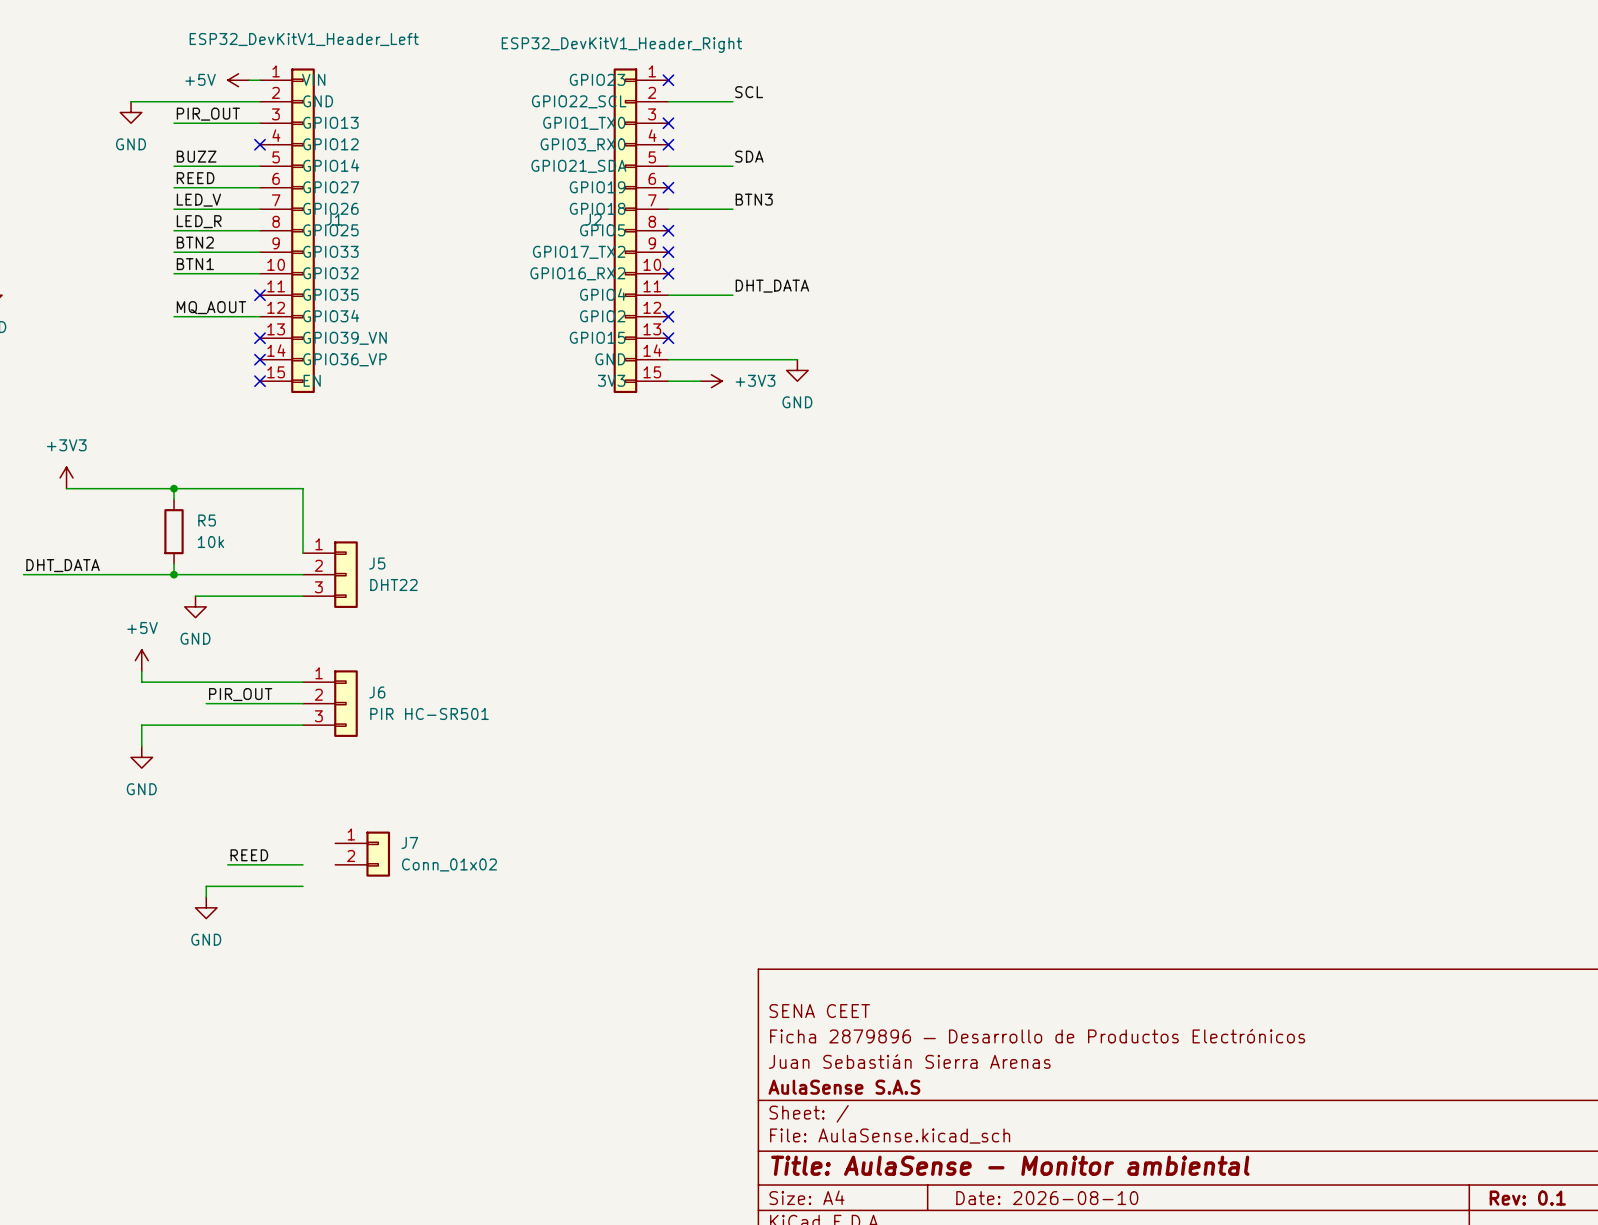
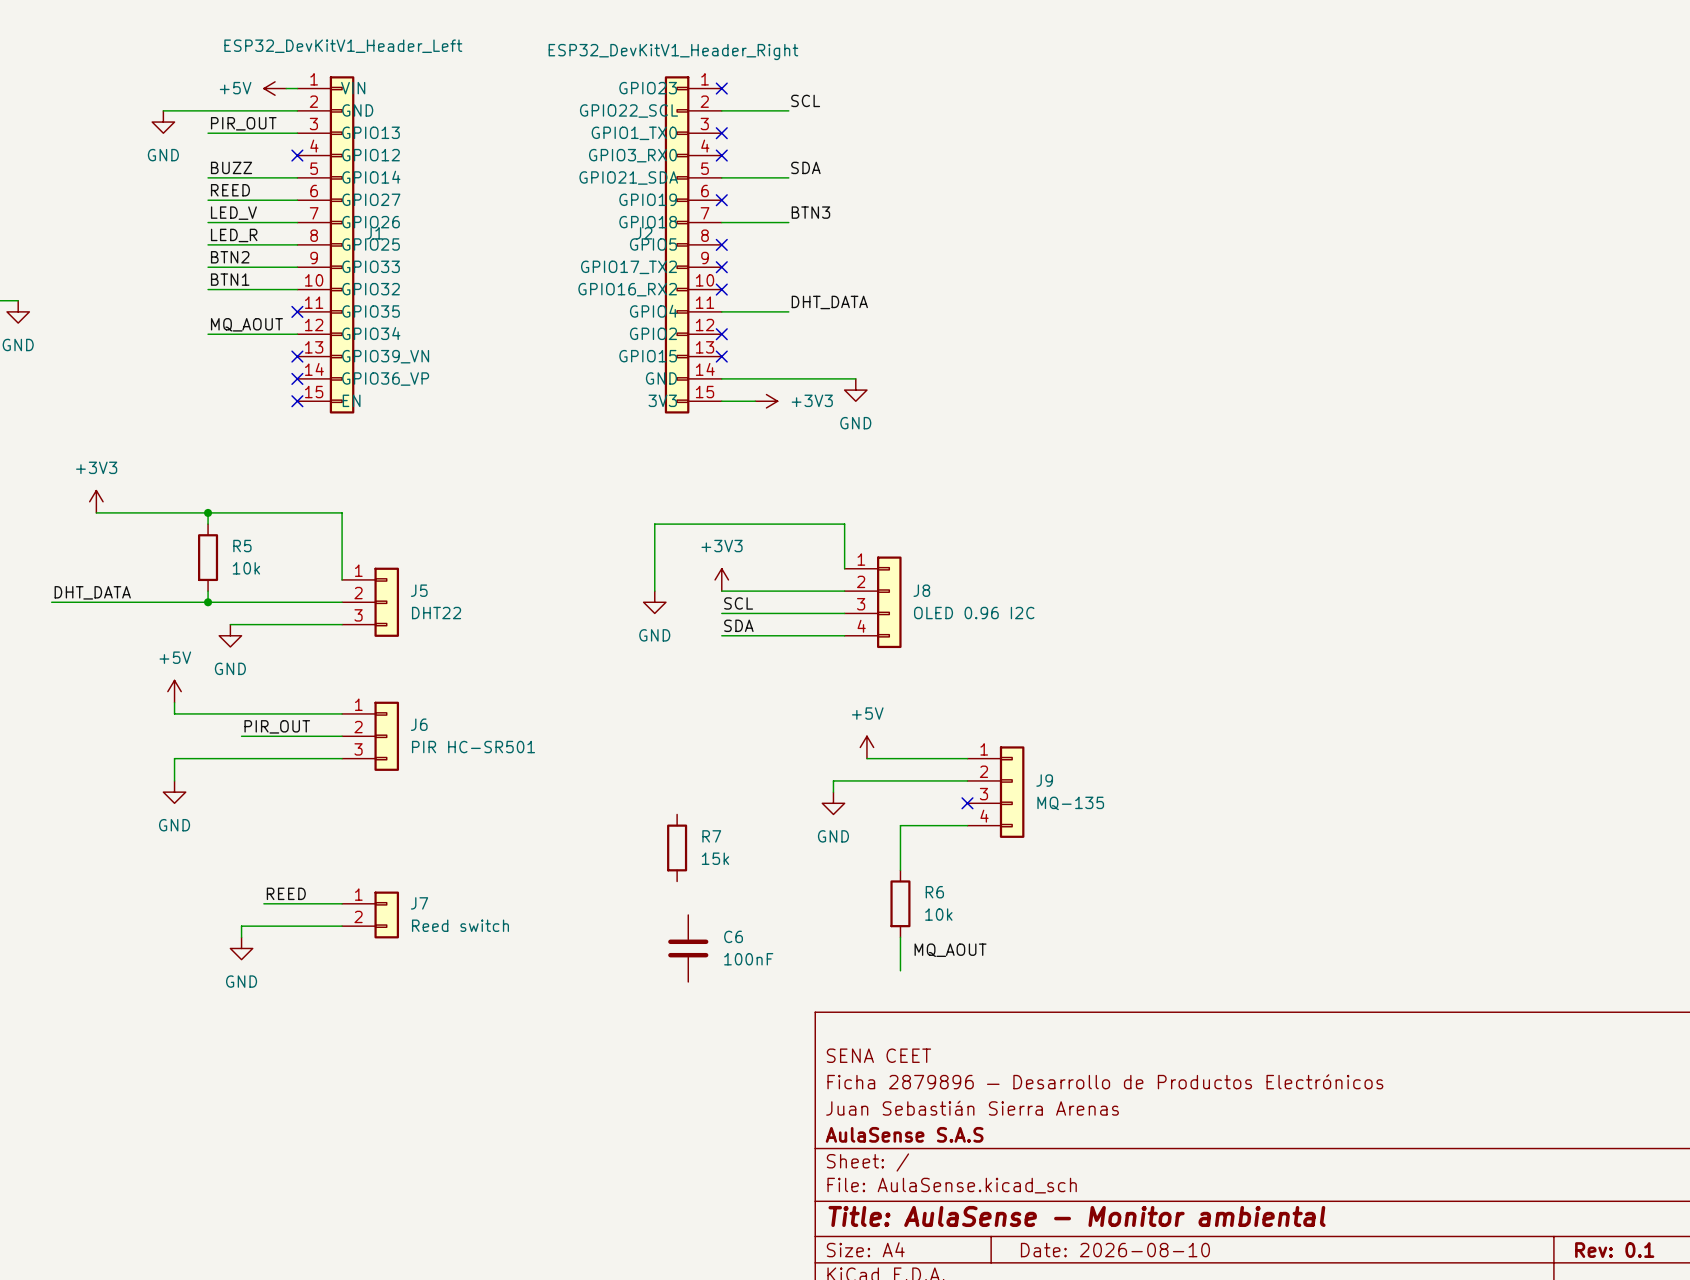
wire: none -> (844, 568) (844, 524) (654, 524) (654, 591)
power symbol: none -> +3V3 (721, 579)
wire: none -> (721, 591) (844, 591)
power symbol: none -> GND (654, 602)
J8: none -> OLED 0.96 I2C (873, 602)
label: none -> SCL (738, 603)
wire: none -> (721, 613) (844, 613)
label: none -> SDA (738, 625)
wire: none -> (721, 635) (844, 635)
power symbol: none -> +5V (866, 747)
wire: none -> (866, 758) (967, 758)
wire: none -> (967, 780) (833, 780) (833, 792)
J9: none -> MQ-135 (995, 792)
power symbol: none -> GND (833, 803)
no-connect mark: none -> (967, 803)
wire: none -> (967, 825) (900, 825) (900, 870)
R7: none -> 15k (677, 847)
J7 position: (362, 854) -> (370, 914)
J7 value: Conn_01x02 (449, 864) -> Reed switch (460, 925)
R6: none -> 10k (900, 903)
wire: none -> (900, 937) (900, 970)
C6: none -> 100nF (688, 948)
label: none -> MQ_AOUT (950, 950)

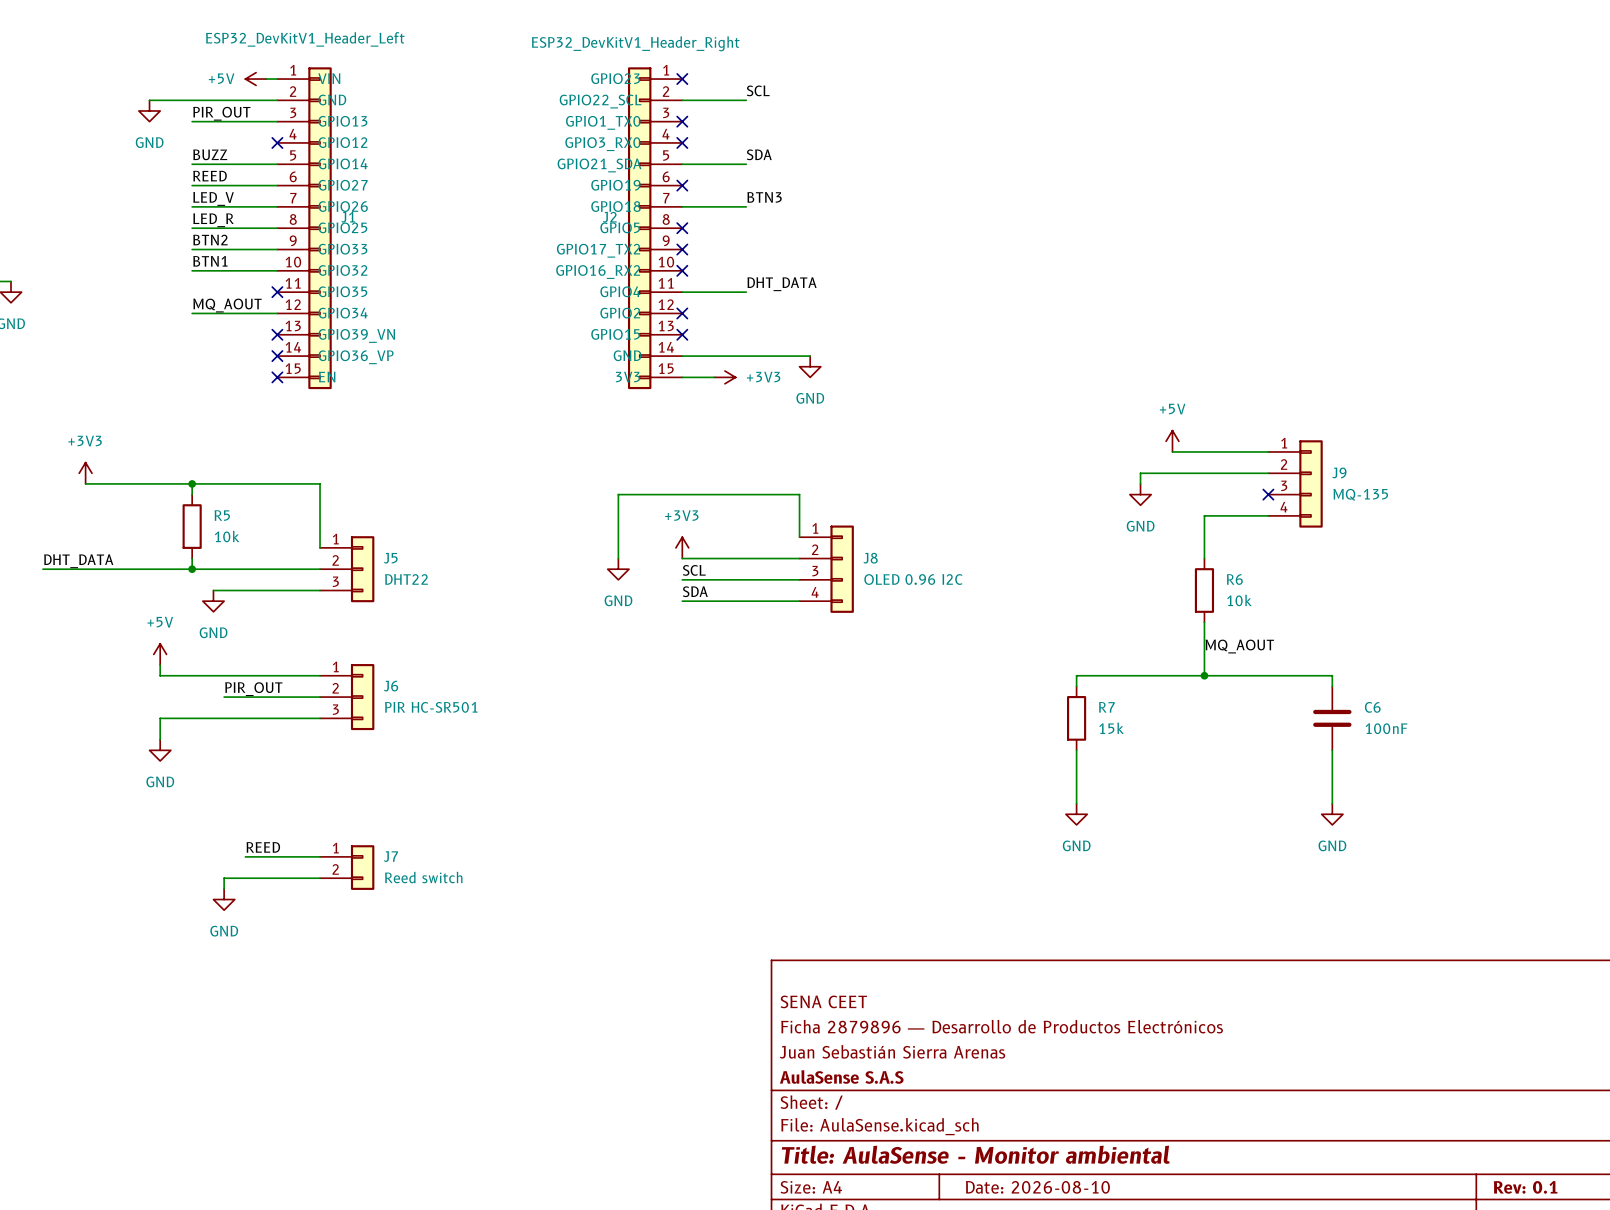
power symbol: none -> +5V (1172, 441)
wire: none -> (1172, 451) (1268, 451)
wire: none -> (1268, 473) (1140, 473) (1140, 483)
power symbol: none -> GND (1140, 494)
no-connect mark: none -> (1268, 494)
wire: none -> (1268, 515) (1204, 515) (1204, 558)
wire: none -> (1204, 622) (1204, 675)
label: none -> MQ_AOUT (1239, 646)
junction: none -> (1204, 675)
wire: none -> (1076, 686) (1076, 675) (1332, 675) (1332, 686)
power symbol: +5V (866, 747) -> none
wire: (866, 758) (967, 758) -> none
wire: (967, 780) (833, 780) (833, 792) -> none
J9 position: (995, 792) -> (1295, 483)
wire: none -> (1076, 750) (1076, 803)
wire: none -> (1332, 750) (1332, 803)
power symbol: GND (833, 803) -> none
no-connect mark: (967, 803) -> none
wire: (967, 825) (900, 825) (900, 870) -> none
R7 position: (677, 847) -> (1076, 718)
power symbol: none -> GND (1076, 814)
power symbol: none -> GND (1332, 814)
R6 position: (900, 903) -> (1204, 590)
wire: (900, 937) (900, 970) -> none
C6 position: (688, 948) -> (1332, 718)
label: MQ_AOUT (950, 950) -> none

